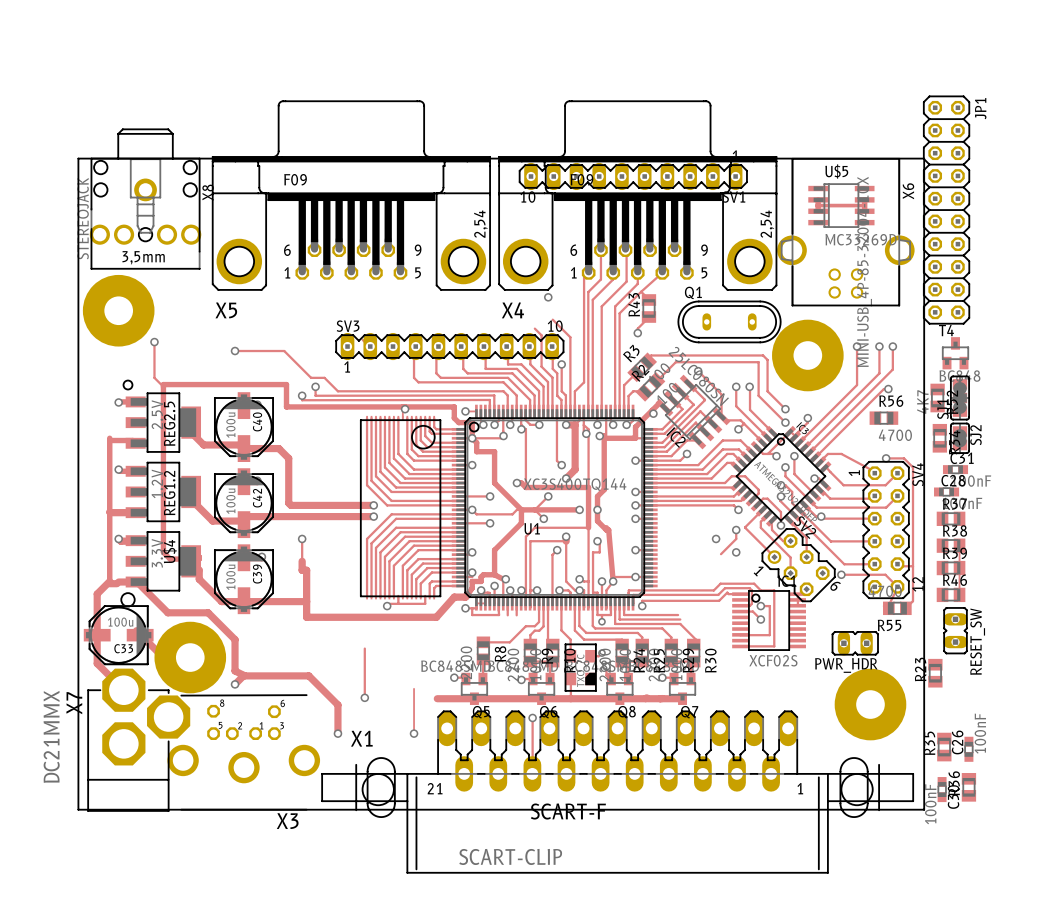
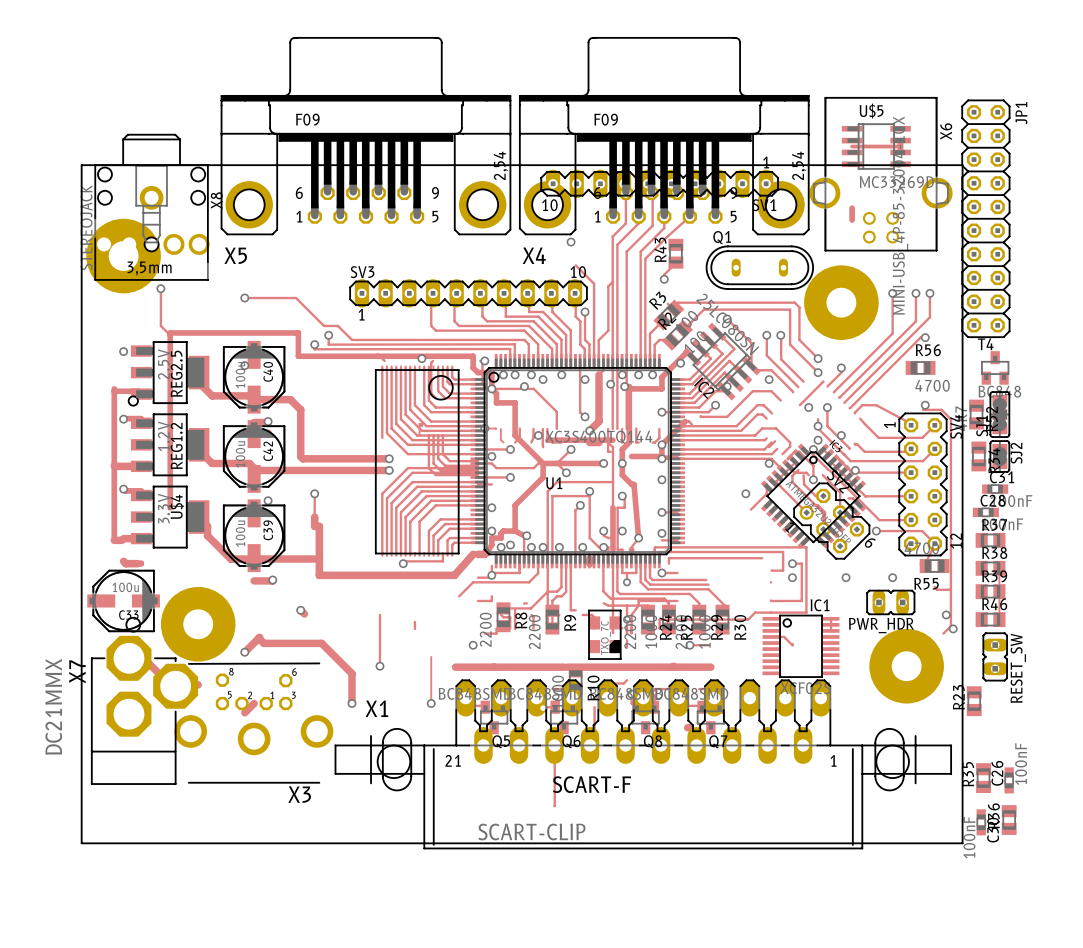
X5 position: (351, 195) -> (365, 136)
X4 position: (637, 195) -> (664, 136)
track: (818, 205) (863, 205) (864, 199) (864, 211) -> (852, 146) (899, 146) (900, 140) (900, 152)
U$5 position: (841, 205) -> (876, 146)
via: none -> (571, 242)
X6 position: (845, 232) -> (881, 174)
track: (600, 250) (600, 279) (588, 292) -> (625, 192) (625, 223) (612, 236) (612, 304)
track: (625, 250) (626, 248) (626, 281) (601, 306) -> (651, 192) (652, 191) (652, 225) (626, 251) (626, 319)
via: none -> (664, 279)
track: (613, 272) (613, 279) (592, 299) -> (638, 216) (638, 223) (617, 244) (617, 312)
track: (637, 272) (637, 283) (615, 306) -> (664, 216) (664, 228) (640, 251) (640, 319)
track: (662, 272) (619, 313) -> (689, 216) (645, 258) (645, 326)
via: none -> (160, 288)
track: none -> (433, 293) (431, 295) (431, 325) (435, 330) (524, 330) (538, 344) (538, 361)
track: none -> (456, 293) (454, 295) (454, 321) (459, 325) (529, 325) (552, 349) (552, 361)
track: none -> (480, 293) (482, 295) (482, 316) (487, 321) (533, 321) (556, 344) (556, 361)
via: none -> (892, 293)
via: none -> (915, 293)
via: none -> (929, 293)
track: none -> (244, 298) (296, 298) (324, 325) (338, 325) (352, 339) (524, 339) (528, 344) (528, 361)
via: none -> (244, 298)
track: none -> (675, 308) (678, 302) (794, 302) (799, 307) (799, 339) (818, 358)
via position: (548, 297) -> (585, 311)
via: none -> (727, 318)
R43 position: (648, 308) -> (675, 253)
part position: (118, 310) -> (123, 256)
track: (584, 317) (584, 382) (574, 391) (574, 411) -> (608, 330) (598, 340) (598, 361)
track: (648, 317) (637, 328) (637, 333) -> (675, 262) (664, 274) (664, 279)
track: (552, 319) (570, 337) -> (575, 265) (594, 283) (594, 351)
via: none -> (328, 335)
Q1 position: (729, 321) -> (759, 267)
via: none -> (766, 335)
via: none -> (780, 335)
via: none -> (925, 337)
track: (534, 328) (541, 335) (541, 366) (552, 377) (552, 411) -> none
via: none -> (314, 344)
via: (637, 333) -> none
track: none -> (700, 348) (710, 358) (689, 379) (677, 379)
via: none -> (123, 351)
track: (154, 342) (154, 377) (163, 386) -> (160, 288) (160, 325) (170, 335)
via: (154, 342) -> none
track: none -> (692, 356) (689, 353) (685, 353) (661, 377) (661, 388) (631, 388) (624, 386) (629, 386) (629, 442) (622, 449) (622, 475) (633, 484) (638, 538) (631, 549)
via: none -> (421, 358)
via: none -> (818, 358)
track: (438, 346) (436, 348) (436, 373) (440, 377) -> (442, 367) (442, 386) (449, 393) (459, 393)
SV3 position: (449, 346) -> (468, 293)
via: none -> (484, 360)
track: (483, 346) (485, 348) (485, 368) (516, 368) (539, 391) (539, 411) -> (504, 293) (505, 295) (505, 316) (538, 316) (561, 339) (561, 361)
track: (506, 346) (508, 364) (521, 364) (543, 386) (543, 411) -> (527, 293) (529, 311) (543, 311) (566, 335) (566, 361)
track: (529, 346) (530, 364) (548, 382) (548, 411) -> (551, 293) (552, 311) (570, 330) (570, 361)
track: (552, 346) (552, 368) (557, 373) (557, 395) (561, 399) (561, 411) -> (575, 293) (575, 316) (580, 321) (580, 344) (584, 349) (584, 361)
track: (570, 346) (570, 411) -> (382, 367) (382, 435)
track: (615, 346) (615, 411) -> none
track: (619, 346) (619, 411) -> none
track: (857, 346) (857, 385) (800, 441) -> (892, 293) (892, 333) (833, 392)
via: (857, 346) -> none
track: (879, 346) (879, 373) (805, 446) -> (915, 293) (915, 321) (839, 397)
via: (879, 346) -> none
track: (892, 346) (892, 369) (810, 451) -> (929, 293) (929, 317) (844, 402)
via: (892, 346) -> none
via: none -> (680, 363)
track: (235, 351) (284, 351) (311, 377) (324, 377) (337, 391) (418, 391) -> (428, 367) (428, 400) (435, 407)
track: none -> (386, 367) (386, 433) (407, 454) (478, 454)
via: none -> (841, 367)
track: (727, 355) (651, 355) (648, 361) -> (757, 370) (751, 366) (751, 343) (727, 318)
track: (740, 355) (763, 355) (767, 359) (767, 391) (785, 409) -> (771, 370) (793, 392)
part position: (807, 355) -> (841, 302)
track: none -> (199, 372) (199, 382) (212, 395) (249, 395) (254, 400)
via: none -> (818, 372)
via: none -> (503, 374)
via: none -> (515, 374)
via: none -> (531, 374)
via: none -> (561, 374)
via: none -> (622, 374)
via: none -> (638, 374)
via: none -> (652, 374)
via: none -> (543, 379)
track: (561, 364) (561, 391) (565, 395) (565, 411) -> (585, 311) (585, 339) (589, 344) (589, 361)
via: none -> (769, 379)
R3 position: (642, 367) -> (668, 314)
via: none -> (610, 384)
via: none -> (524, 386)
via: none -> (624, 386)
track: (698, 371) (721, 394) (721, 416) (727, 420) (740, 420) (761, 441) -> none
track: none -> (114, 388) (114, 456)
via: none -> (491, 388)
track: (636, 373) (624, 385) (624, 411) -> (662, 321) (650, 333) (650, 361)
track: none -> (724, 391) (715, 391) (699, 407) (677, 407)
track: (458, 377) (508, 377) (530, 399) (530, 411) -> none
track: (656, 380) (675, 362) (758, 362) (758, 395) (785, 422) -> (683, 329) (703, 309) (790, 309) (790, 344) (818, 372)
track: (418, 382) (427, 382) -> (438, 367) (438, 391) (445, 398)
track: (458, 382) (503, 382) (516, 395) (516, 411) -> none
track: none -> (254, 399) (290, 399) (300, 409) (300, 456) (303, 458) (389, 458)
track: (688, 383) (704, 400) (662, 442) (650, 442) -> (717, 331) (734, 349) (689, 393) (677, 393)
track: (163, 384) (286, 384) (286, 406) (454, 406) (454, 418) (458, 422) -> (170, 400) (170, 332) (298, 332) (298, 356) (473, 356) (473, 367) (477, 372) (491, 372) (491, 388)
track: (315, 386) (315, 395) (494, 395) (494, 411) -> (328, 335) (328, 344) (514, 344) (514, 361)
via: (315, 386) -> none
R2 position: (650, 386) -> (677, 335)
track: (736, 386) (736, 406) (766, 436) -> (766, 335) (766, 355) (798, 387)
via: (736, 386) -> none
track: (749, 386) (750, 409) (771, 431) -> (780, 335) (781, 359) (803, 381)
via: (749, 386) -> none
via: none -> (715, 405)
track: (888, 389) (883, 389) (815, 456) -> (925, 337) (920, 337) (849, 408)
track: (458, 391) (503, 391) (507, 395) (507, 411) -> none
track: (642, 391) (633, 391) (628, 396) (628, 411) -> (668, 339) (659, 339) (654, 344) (654, 361)
track: (680, 391) (693, 404) (664, 433) (650, 433) -> (708, 340) (722, 353) (692, 384) (677, 384)
via: none -> (808, 407)
via: none -> (827, 407)
track: (302, 395) (302, 400) (489, 399) (489, 411) -> (314, 344) (314, 349) (510, 349) (510, 361)
via: (302, 395) -> none
via: none -> (661, 412)
via: none -> (585, 416)
track: (673, 400) (682, 409) (662, 429) (650, 429) -> (701, 416) (727, 416) (752, 391) (771, 391) (780, 400)
via: (405, 409) -> none
track: (503, 411) (503, 436) (501, 438) (458, 438) -> none
track: (556, 411) (556, 460) (561, 465) -> (580, 361) (580, 412) (585, 416)
track: (579, 411) (579, 420) (575, 424) (575, 469) (566, 478) -> (603, 360) (603, 370) (599, 374) (599, 421) (589, 430)
track: (606, 411) (606, 438) (599, 436) (604, 436) (604, 489) (597, 496) (597, 521) (608, 530) (613, 581) -> none
IC2 position: (693, 412) -> (721, 361)
via: none -> (589, 430)
via: (653, 413) -> none
track: (371, 418) (371, 478) -> (478, 472) (412, 472) (386, 498)
track: (375, 418) (375, 476) (391, 491) (458, 491) -> (391, 367) (391, 428) (407, 444) (478, 444)
track: (380, 418) (380, 471) (396, 487) (458, 487) -> none
track: (384, 418) (384, 467) (400, 483) (458, 483) -> (400, 367) (400, 419) (417, 435) (478, 435)
track: (389, 418) (389, 462) (405, 478) (458, 478) -> (405, 367) (405, 414) (421, 430) (478, 430)
track: (393, 418) (393, 458) (409, 474) (458, 474) -> (410, 367) (410, 409) (426, 426) (478, 426)
track: (398, 418) (398, 453) (414, 469) (458, 469) -> (414, 367) (414, 405) (431, 421) (478, 421)
track: (407, 418) (407, 453) (414, 460) (458, 460) -> (424, 367) (424, 405) (431, 412) (478, 412)
track: (429, 418) (429, 431) (431, 433) (458, 433) -> (447, 367) (447, 381) (449, 384) (478, 384)
track: (434, 418) (434, 427) (436, 429) (458, 429) -> (452, 367) (452, 377) (454, 379) (478, 379)
via: none -> (538, 435)
track: (807, 418) (807, 422) (794, 436) -> (841, 367) (841, 372) (827, 386)
R56 position: (883, 418) -> (920, 367)
track: (367, 420) (367, 474) -> (478, 468) (407, 468) (382, 493)
REG2.5 position: (163, 422) -> (170, 372)
track: (458, 422) (472, 422) (472, 438) -> (477, 440) (412, 440) (396, 423) (396, 367)
track: none -> (547, 440) (613, 440)
via: (483, 424) -> none
via: (494, 424) -> none
via: (510, 424) -> none
track: (521, 424) (525, 429) (525, 471) -> (613, 482) (557, 482) (547, 491)
via: (539, 424) -> none
via: (566, 424) -> none
via: (597, 424) -> none
via: (613, 424) -> none
via: (626, 424) -> none
track: (713, 424) (700, 411) (664, 447) (650, 447) -> (743, 374) (729, 360) (692, 398) (677, 398)
C40 position: (243, 427) -> (254, 377)
via: none -> (661, 444)
via: (521, 429) -> none
via position: (738, 429) -> (769, 463)
via: none -> (510, 449)
via: none -> (571, 449)
via: none -> (813, 449)
track: (790, 431) (767, 453) -> (822, 381) (799, 405)
track: (705, 432) (695, 422) (666, 451) (650, 451) -> (734, 382) (724, 372) (694, 402) (677, 402)
via: (586, 433) -> none
via: (503, 436) -> none
via: (599, 436) -> none
track: (472, 438) (476, 442) (476, 451) (494, 451) (494, 483) (521, 509) -> (491, 388) (496, 393) (496, 402) (515, 402) (515, 435) (543, 463)
track: (109, 440) (132, 440) (135, 443) -> (114, 391) (138, 391) (141, 394)
via: none -> (389, 458)
via: none -> (661, 458)
track: (687, 440) (671, 456) (650, 456) -> (715, 458) (661, 458)
track: (722, 440) (698, 465) (650, 465) -> (752, 458) (724, 458)
via: none -> (603, 463)
via: none -> (622, 463)
track: (243, 448) (278, 448) (288, 458) (288, 503) (290, 505) (302, 505) -> (314, 493) (314, 526)
via: none -> (389, 470)
via: none -> (855, 470)
via: none -> (566, 472)
track: (687, 453) (680, 460) (635, 460) -> (715, 405) (708, 412) (661, 412)
via: (687, 453) -> none
track: (746, 456) (738, 449) (722, 449) (702, 469) (650, 469) -> none
via: (776, 456) -> none
track: (794, 456) (794, 474) (815, 495) -> (827, 407) (827, 426) (849, 448)
via: (794, 456) -> none
via: none -> (510, 477)
track: (886, 458) (904, 458) (912, 467) -> (922, 409) (941, 409) (950, 419) (950, 486)
via: (886, 458) -> none
via: none -> (813, 479)
track: (741, 461) (733, 453) (727, 453) (707, 474) (650, 474) -> (771, 413) (763, 405) (757, 405) (736, 426) (677, 426)
track: (820, 461) (827, 453) (841, 453) (874, 471) -> (854, 413) (862, 405) (876, 405) (911, 423)
via: (472, 465) -> none
via: (561, 465) -> none
track: (736, 466) (732, 462) (727, 462) (711, 478) (650, 478) -> (766, 418) (762, 414) (757, 414) (741, 430) (677, 430)
track: (825, 466) (843, 485) (885, 485) (897, 473) -> (860, 418) (878, 437) (922, 437) (934, 425)
track: none -> (478, 486) (417, 486) (396, 507) (396, 554)
track: (785, 467) (785, 476) (816, 507) (886, 507) (897, 495) -> (818, 419) (818, 428) (850, 461) (922, 461) (934, 448)
via: (785, 467) -> none
via: none -> (589, 491)
via: none -> (314, 493)
via: none -> (745, 493)
via: none -> (622, 496)
via: (566, 478) -> none
via: (814, 478) -> none
track: (371, 480) (391, 500) (458, 500) -> (386, 500) (386, 554)
track: (516, 483) (521, 483) (525, 487) (588, 487) -> none
via: (516, 483) -> none
track: (650, 483) (725, 483) (731, 476) (745, 476) (758, 489) (758, 493) (751, 500) -> (677, 435) (755, 435) (762, 428) (776, 428) (790, 442) (790, 446) (782, 454)
track: (367, 485) (387, 505) (458, 505) -> (382, 505) (382, 554)
via: none -> (580, 505)
track: (736, 485) (734, 487) (650, 487) -> (766, 438) (764, 440) (677, 440)
via: (780, 485) -> none
track: (163, 487) (163, 552) (170, 559) (199, 559) (199, 556) (191, 557) (191, 561) -> none
via: none -> (491, 507)
track: (740, 489) (733, 496) (650, 496) -> (771, 442) (764, 449) (677, 449)
track: (820, 490) (830, 498) (872, 498) (874, 496) -> (854, 443) (864, 451) (908, 451) (911, 449)
REG1.2 position: (163, 491) -> (170, 444)
track: (746, 495) (741, 500) (650, 500) -> (777, 448) (771, 454) (677, 454)
track: (191, 496) (191, 499) (212, 521) (240, 521) (243, 524) -> none
track: (458, 496) (490, 496) -> (478, 449) (510, 449)
via: (490, 496) -> none
track: (548, 496) (534, 509) (543, 518) -> (571, 449) (557, 463) (566, 472)
via: (548, 496) -> none
track: (780, 496) (780, 500) (795, 516) -> (813, 449) (812, 454) (828, 469)
via: (780, 496) -> none
C42 position: (243, 503) -> (254, 456)
track: (306, 505) (373, 505) -> (319, 526) (319, 575) (454, 575) (473, 554)
via: (373, 505) -> none
track: (635, 505) (733, 505) (738, 509) -> none
via: (635, 505) -> none
track: (756, 506) (763, 498) (767, 498) (780, 512) (780, 525) -> (787, 459) (794, 451) (799, 451) (813, 465) (813, 479)
track: (805, 506) (816, 516) (821, 516) (818, 518) (874, 518) -> (839, 459) (850, 470) (855, 470) (852, 472) (911, 472)
part position: (400, 507) -> (417, 461)
U1 position: (554, 507) -> (577, 461)
track: (458, 509) (472, 509) (476, 514) (512, 514) (516, 509) (521, 509) -> (478, 463) (491, 463) (496, 468) (533, 468) (538, 463) (543, 463)
track: none -> (515, 531) (503, 531) (501, 538) (491, 538) (491, 545) (487, 552) (484, 554) (478, 554)
track: (521, 509) (521, 523) (494, 550) (494, 574) -> (543, 463) (543, 477) (515, 505) (515, 531)
track: (521, 509) (579, 509) -> (543, 463) (603, 463)
via: (738, 509) -> none
via: none -> (876, 531)
track: (761, 511) (745, 527) (774, 557) -> (793, 464) (776, 482) (806, 512)
track: (800, 511) (831, 541) (874, 541) -> (833, 464) (865, 496) (911, 496)
track: (109, 512) (135, 512) -> (114, 465) (141, 466)
via: none -> (661, 533)
track: (458, 514) (391, 514) (367, 538) (367, 597) -> none
via: none -> (526, 535)
track: none -> (603, 535) (613, 538)
track: (373, 516) (248, 516) (243, 521) -> (389, 470) (258, 470) (254, 475)
via: (373, 516) -> none
via: none -> (638, 538)
track: (766, 516) (760, 521) (760, 527) (790, 557) (790, 573) -> (798, 469) (792, 475) (792, 482) (823, 513) (823, 529)
track: (796, 516) (844, 564) (874, 564) -> (829, 470) (879, 520) (911, 519)
via: (821, 516) -> none
track: (109, 518) (109, 583) (135, 582) -> (114, 540) (141, 538)
track: (458, 518) (396, 518) (371, 543) (371, 597) -> none
via: (543, 518) -> none
via: (635, 518) -> none
track: (771, 521) (772, 530) (783, 541) (790, 541) -> (803, 475) (804, 484) (815, 496) (823, 495)
track: (789, 521) (806, 537) (806, 557) -> (822, 475) (840, 492) (840, 512)
track: (458, 523) (490, 523) -> (478, 477) (510, 477)
via: none -> (501, 547)
via: none -> (531, 547)
via: none -> (543, 547)
via: none -> (559, 547)
via: none -> (582, 547)
via: none -> (603, 547)
via: (780, 525) -> none
track: (458, 527) (396, 527) (375, 547) (375, 597) -> (478, 482) (412, 482) (391, 503) (391, 554)
track: (588, 527) (534, 527) (525, 536) -> (547, 507) (547, 559)
track: (736, 530) (736, 538) (721, 554) -> (766, 484) (766, 493) (750, 509)
via: (736, 530) -> none
SV4 position: (886, 530) -> (922, 484)
track: (454, 532) (400, 532) (380, 552) (380, 597) -> none
track: none -> (762, 558) (668, 558) (668, 563)
track: (458, 536) (405, 536) (384, 556) (384, 597) -> (478, 491) (421, 491) (400, 512) (400, 554)
via: (566, 536) -> none
via: (118, 538) -> none
track: (302, 538) (302, 570) (306, 570) (306, 617) (436, 617) (454, 597) (465, 597) (472, 588) (472, 581) (481, 581) (483, 574) (494, 574) -> none
via: (302, 538) -> none
track: none -> (538, 560) (538, 573) (529, 582) (478, 582)
track: none -> (561, 560) (561, 587) (557, 591) (547, 591) (530, 608) (503, 608)
track: none -> (570, 560) (570, 610) (575, 610)
track: none -> (603, 560) (603, 591) (610, 598) (664, 598) (668, 603) (668, 610)
track: none -> (617, 560) (617, 591) (620, 593) (689, 593) (699, 603) (699, 610)
track: none -> (640, 560) (640, 582) (647, 589) (708, 589) (724, 605) (722, 610)
track: none -> (645, 560) (645, 579) (650, 584) (708, 584)
track: none -> (650, 560) (650, 577) (652, 579) (706, 579)
track: none -> (659, 560) (659, 552) (783, 552) (783, 570) (771, 570)
via: (716, 538) -> none
via: none -> (403, 563)
track: (458, 541) (409, 541) (389, 561) (389, 597) -> (478, 496) (426, 496) (405, 517) (405, 554)
track: (530, 541) (566, 541) (566, 581) (575, 590) (584, 590) (584, 607) (583, 603) -> (552, 563) (552, 496) (589, 496) (589, 538) (599, 547) (608, 547) (608, 565) (608, 560)
track: (597, 541) (599, 543) (599, 552) (593, 552) (593, 592) (597, 592) (597, 615) (610, 615) (610, 603) -> (622, 496) (624, 498) (624, 507) (617, 507) (617, 549) (622, 549) (622, 573) (636, 573) (636, 560)
via: (597, 541) -> none
track: none -> (792, 563) (801, 563) (801, 600) (770, 600)
via: none -> (792, 563)
track: (530, 542) (530, 577) -> (566, 560) (566, 591) (552, 600)
track: (458, 545) (414, 545) (393, 565) (393, 597) -> (478, 500) (431, 500) (410, 521) (410, 554)
track: (458, 550) (418, 550) (402, 565) (402, 597) -> (478, 505) (435, 505) (419, 521) (419, 554)
track: (557, 550) (552, 554) (552, 603) -> (580, 505) (575, 510) (575, 560)
via: (557, 550) -> none
track: none -> (626, 573) (626, 582)
via: (736, 552) -> none
via: none -> (792, 577)
via: none -> (846, 577)
via: none -> (892, 577)
track: (454, 559) (418, 559) (407, 570) (407, 597) -> (473, 582) (459, 596)
via: none -> (626, 582)
U$4 position: (163, 561) -> (170, 517)
track: (190, 561) (199, 570) (199, 579) (221, 601) (243, 600) -> (198, 517) (207, 526) (207, 535) (230, 559) (254, 558)
track: (458, 563) (422, 563) (411, 574) (411, 597) -> (478, 519) (440, 519) (428, 531) (428, 554)
SV2 position: (798, 565) -> (831, 521)
track: (458, 568) (427, 568) (416, 579) (416, 597) -> (478, 524) (445, 524) (433, 535) (433, 554)
track: (458, 572) (431, 572) (420, 583) (420, 597) -> (477, 528) (449, 528) (438, 540) (438, 554)
via: (472, 572) -> none
track: (494, 574) (503, 579) (503, 603) -> (515, 531) (524, 535) (524, 560)
track: (841, 574) (885, 574) (897, 588) (888, 606) (883, 606) -> (876, 531) (922, 531) (934, 544) (925, 563) (920, 563)
via: (841, 574) -> none
via: (635, 577) -> none
C39 position: (243, 579) -> (254, 535)
via: (505, 579) -> none
via: (579, 579) -> none
track: (109, 581) (97, 594) (97, 663) (123, 690) -> none
track: (136, 581) (167, 612) (208, 612) (235, 639) (235, 670) (244, 675) (308, 675) (337, 704) (337, 733) -> none
track: (458, 581) (431, 581) (429, 583) (429, 597) -> (478, 538) (449, 538) (447, 540) (447, 554)
track: none -> (613, 605) (647, 605) (647, 610)
via: (601, 581) -> none
via: (613, 581) -> none
track: none -> (300, 610) (304, 614)
via: none -> (300, 610)
track: (458, 585) (436, 585) (434, 588) (434, 597) -> (478, 542) (454, 542) (452, 545) (452, 554)
via: (494, 585) -> none
track: (749, 588) (751, 590) (751, 603) (749, 605) (740, 605) -> (780, 612) (806, 612) (806, 547) (654, 547) (654, 560)
via: (481, 590) -> none
via: (510, 590) -> none
via: (521, 590) -> none
via: (537, 590) -> none
via: (559, 590) -> none
via: (579, 590) -> none
via: none -> (946, 614)
track: (740, 594) (727, 592) (719, 600) (642, 600) (642, 606) -> none
track: (243, 597) (248, 601) (306, 601) -> (254, 554) (258, 559) (319, 559)
track: (425, 597) (425, 603) (387, 603) (387, 606) -> (442, 554) (442, 561) (403, 561) (403, 563)
track: (498, 603) (499, 615) (472, 615) (472, 608) -> (519, 560) (519, 573) (491, 573) (491, 566)
track: (507, 603) (507, 615) -> none
track: (516, 603) (516, 615) -> none
track: (539, 603) (539, 622) (534, 626) (525, 626) (509, 642) (483, 642) -> none
track: (543, 603) (543, 626) (530, 635) (530, 644) -> none
track: (548, 603) (548, 643) (552, 644) -> none
track: (561, 603) (561, 630) (570, 639) (570, 656) -> none
track: (574, 603) (574, 630) (584, 639) (622, 639) (622, 644) -> none
track: (579, 603) (579, 625) (586, 632) (637, 632) (642, 637) (642, 644) -> none
track: (592, 603) (592, 625) (595, 628) (662, 628) (671, 637) (671, 644) -> none
track: (615, 603) (615, 623) (680, 623) (695, 639) (693, 644) -> none
track: (619, 603) (619, 619) (662, 619) -> none
track: (624, 603) (624, 615) (678, 615) -> none
track: (628, 603) (628, 590) (713, 590) (720, 583) (754, 583) (760, 590) (774, 590) (774, 646) (740, 646) -> none
via: none -> (953, 628)
via: (387, 606) -> none
via position: (642, 606) -> (689, 645)
track: (760, 606) (769, 606) (769, 635) (740, 634) -> none
via: (760, 606) -> none
via position: (465, 608) -> (473, 645)
R55 position: (897, 608) -> (934, 566)
track: none -> (259, 637) (244, 652)
track: none -> (258, 638) (263, 643) (321, 643) (352, 673) (352, 703)
via: (760, 619) -> none
via position: (601, 621) -> (626, 619)
via: none -> (244, 652)
C33 position: (118, 635) -> (123, 600)
via: none -> (379, 666)
PWR_HDR position: (855, 643) -> (890, 602)
track: (364, 648) (364, 697) -> (379, 614) (379, 666)
R8 position: (483, 650) -> (503, 617)
R9 position: (530, 653) -> (552, 619)
via: (601, 653) -> none
R24 position: (622, 653) -> (647, 619)
R25 position: (642, 653) -> (668, 619)
R29 position: (671, 653) -> (699, 619)
R30 position: (693, 653) -> (722, 619)
part position: (190, 657) -> (198, 624)
part position: (580, 667) -> (604, 634)
via: none -> (352, 703)
via: none -> (431, 703)
via: (454, 677) -> none
via: (662, 677) -> none
via: (235, 684) -> none
track: (414, 688) (414, 733) -> (431, 656) (431, 703)
via: (364, 697) -> none
track: (436, 697) (541, 698) -> (454, 666) (564, 667)
track: (543, 697) (682, 698) -> (566, 666) (710, 667)
part position: (870, 704) -> (906, 666)
via: (532, 717) -> none
via: (337, 733) -> none
via: (414, 733) -> none
X7 position: (138, 740) -> (144, 710)
X3 position: (243, 752) -> (253, 723)
X1 position: (617, 792) -> (643, 764)

